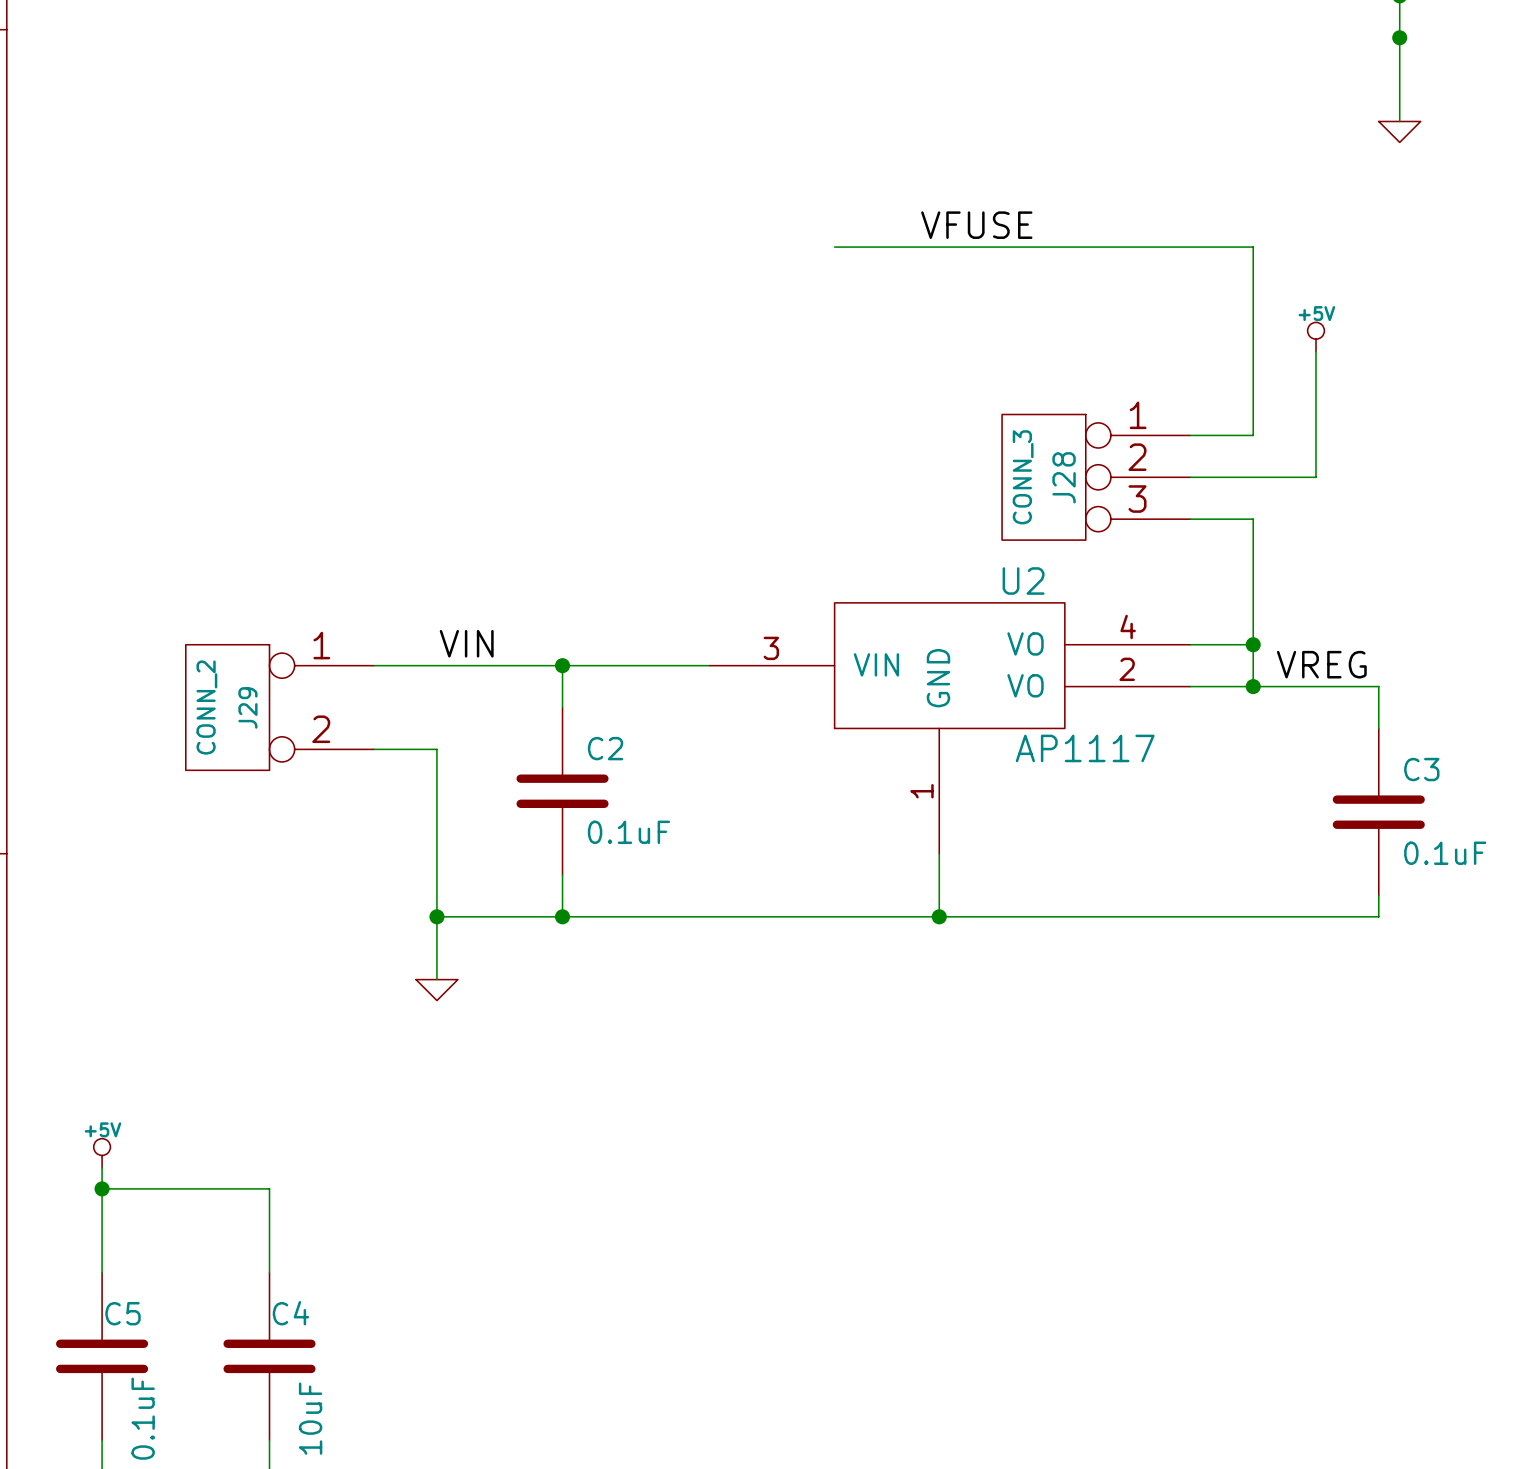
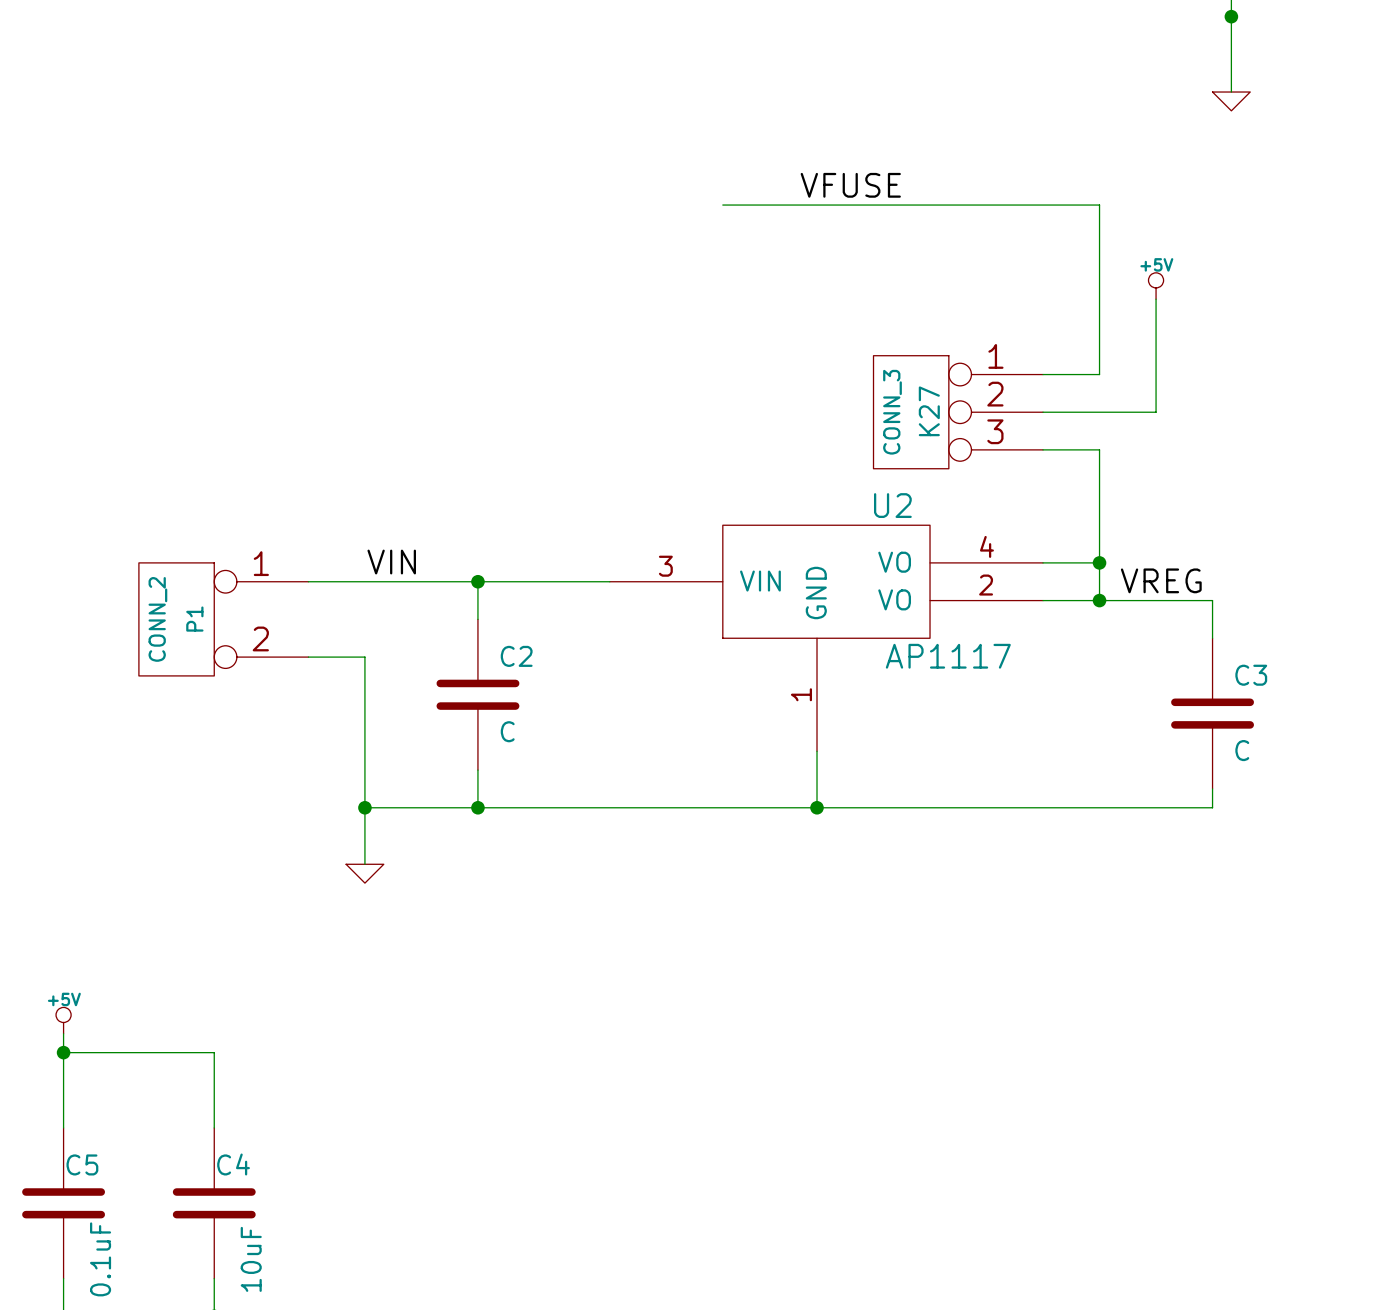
J28 name: J28 (1064, 477) -> K27 (929, 411)
J29 name: J29 (247, 707) -> P1 (194, 619)
C2 value: 0.1uF (628, 832) -> C (507, 731)
C3 value: 0.1uF (1445, 853) -> C (1242, 750)

